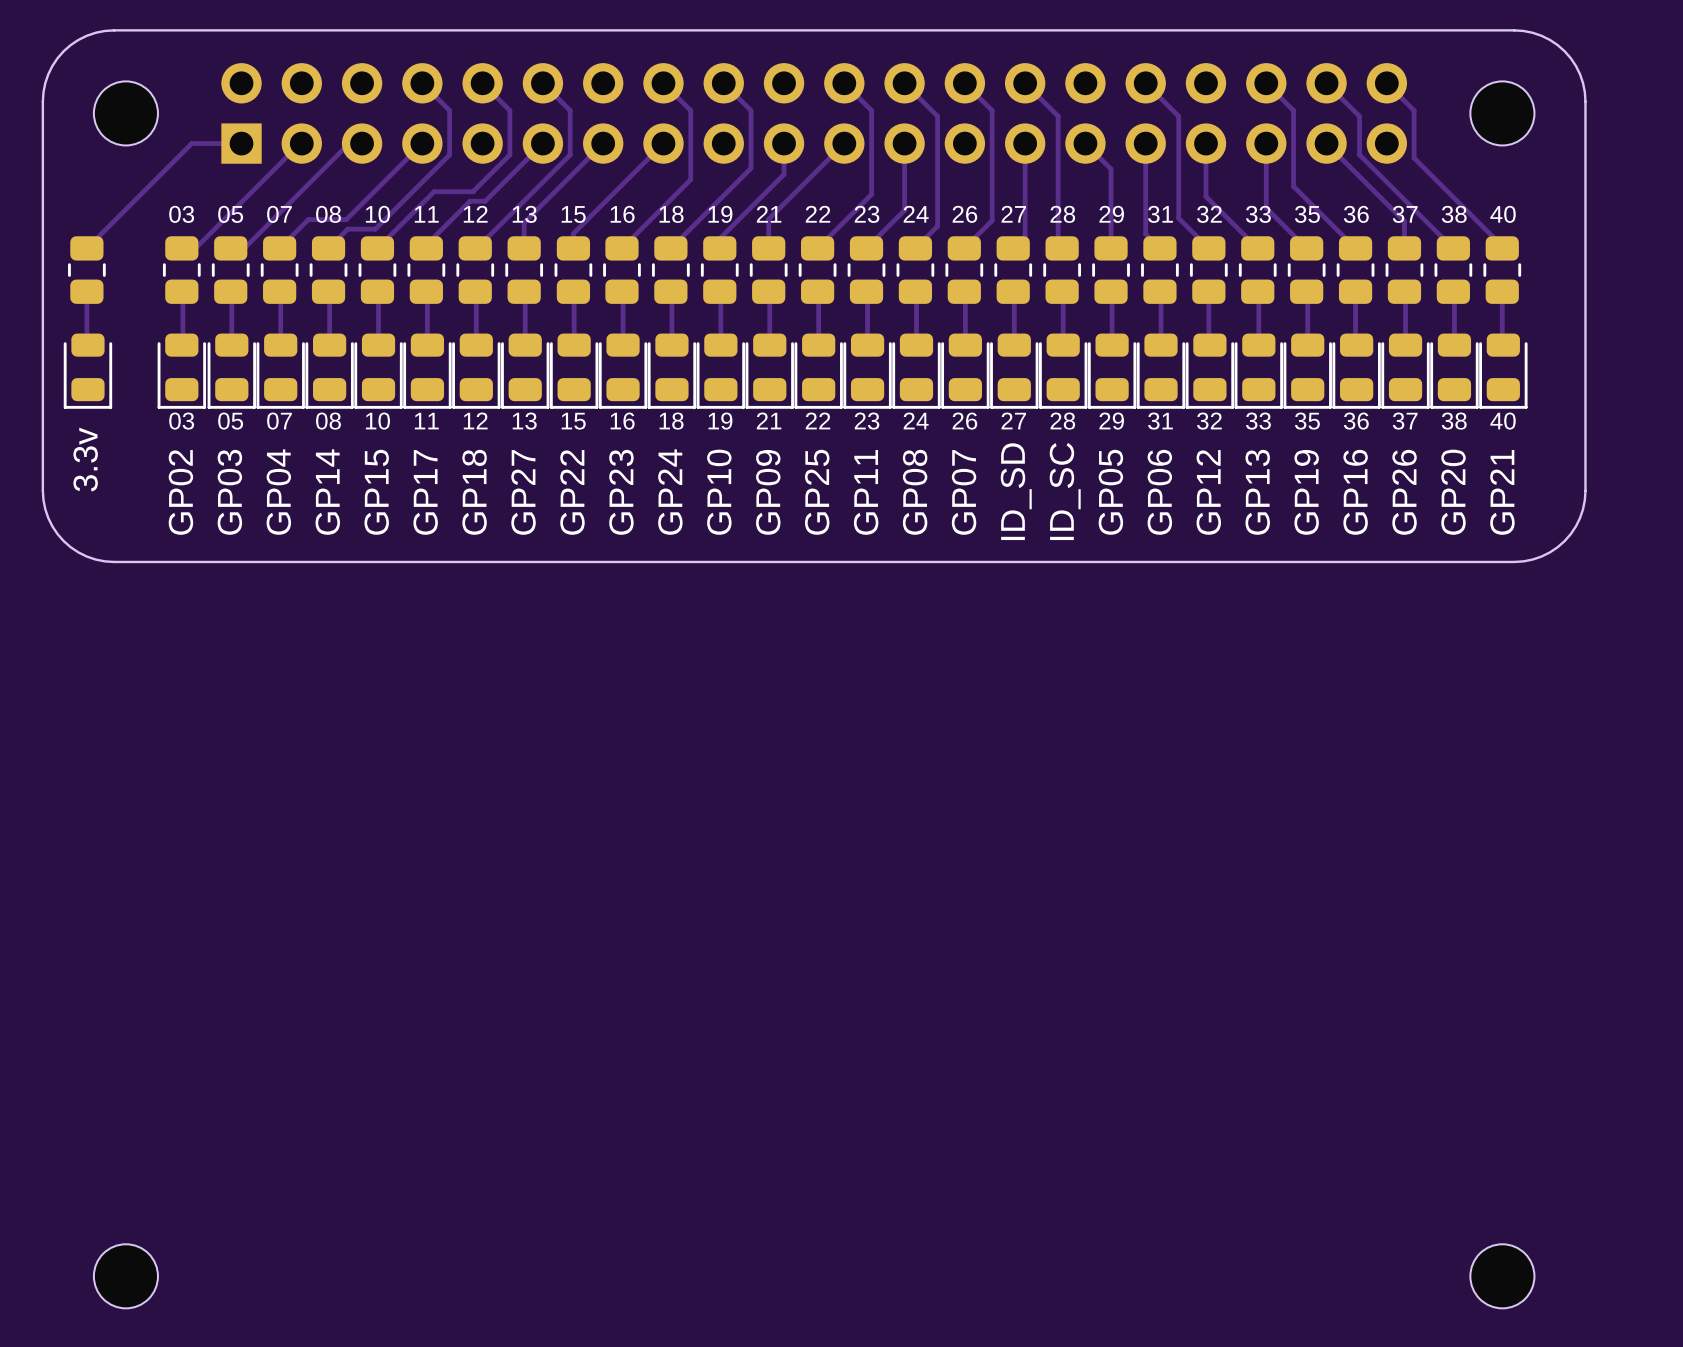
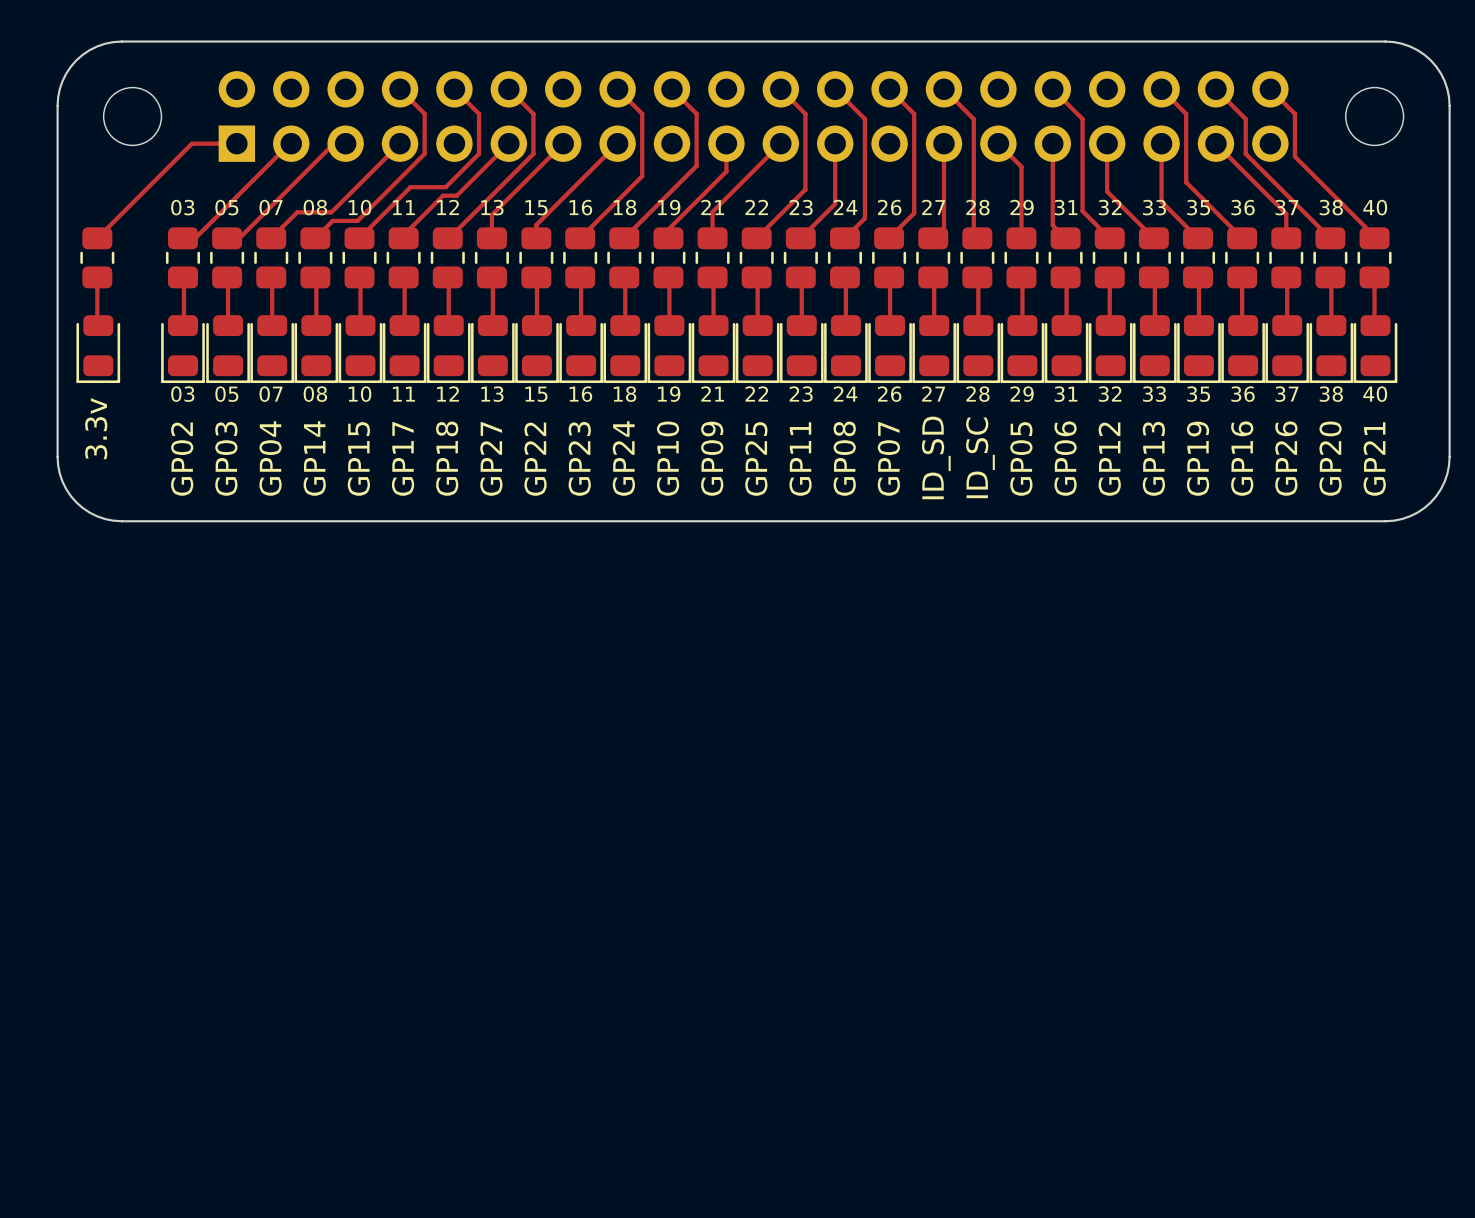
part: (125, 1276) -> none
part: (1502, 1276) -> none

